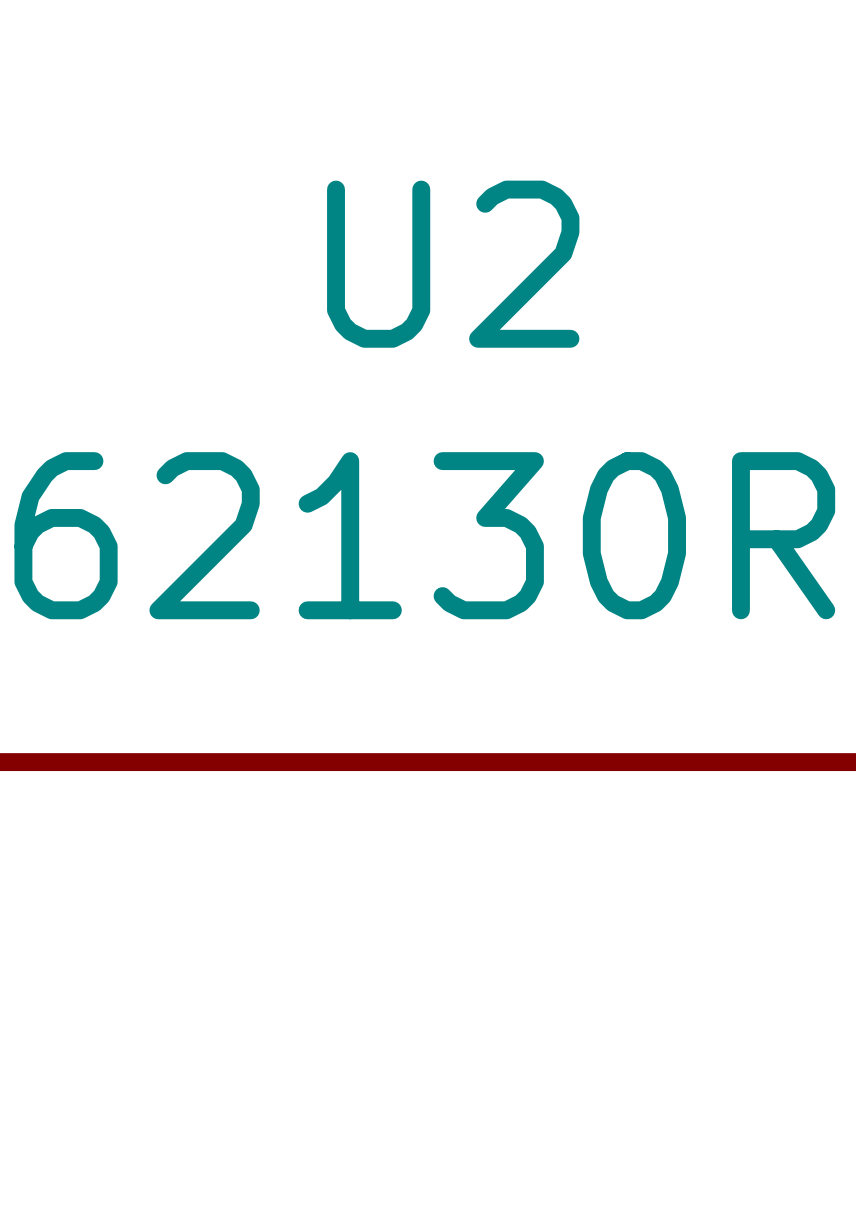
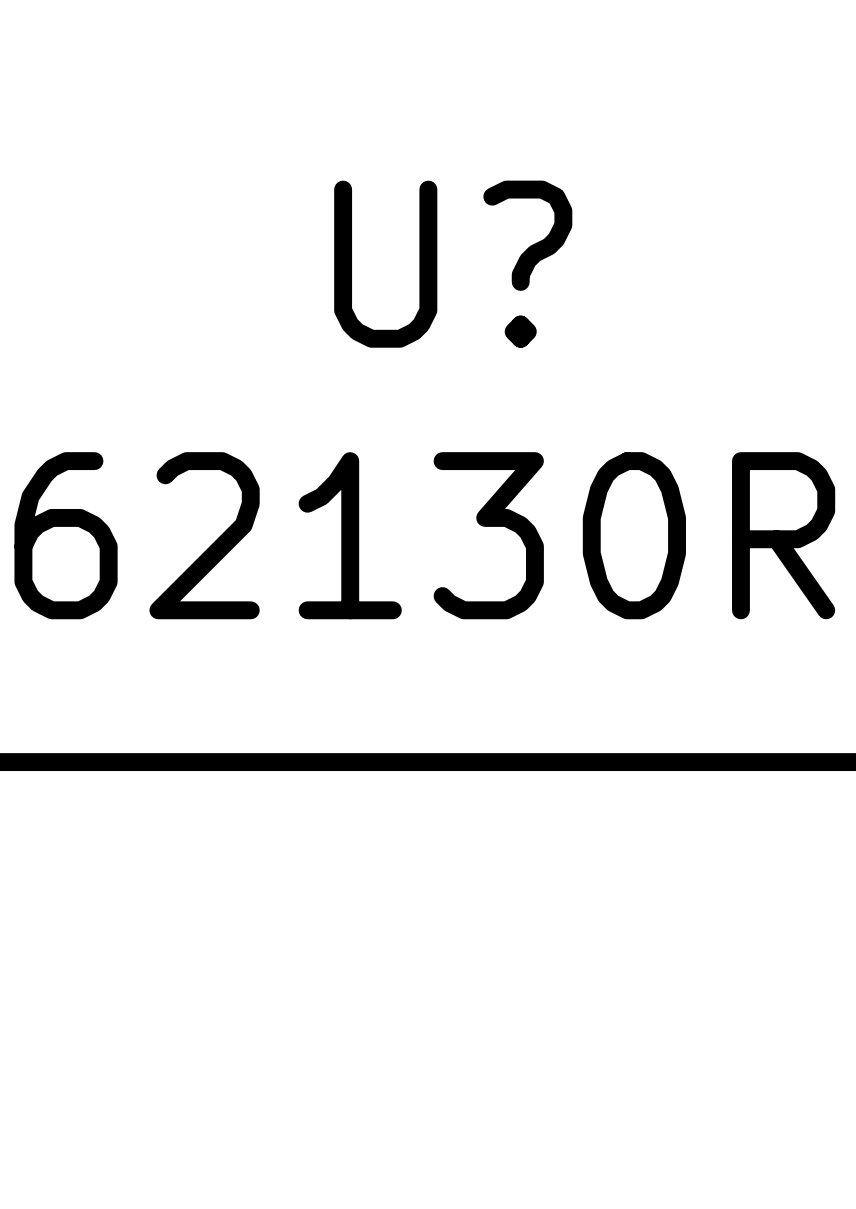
U2 name: U2 (453, 264) -> U? (453, 264)

